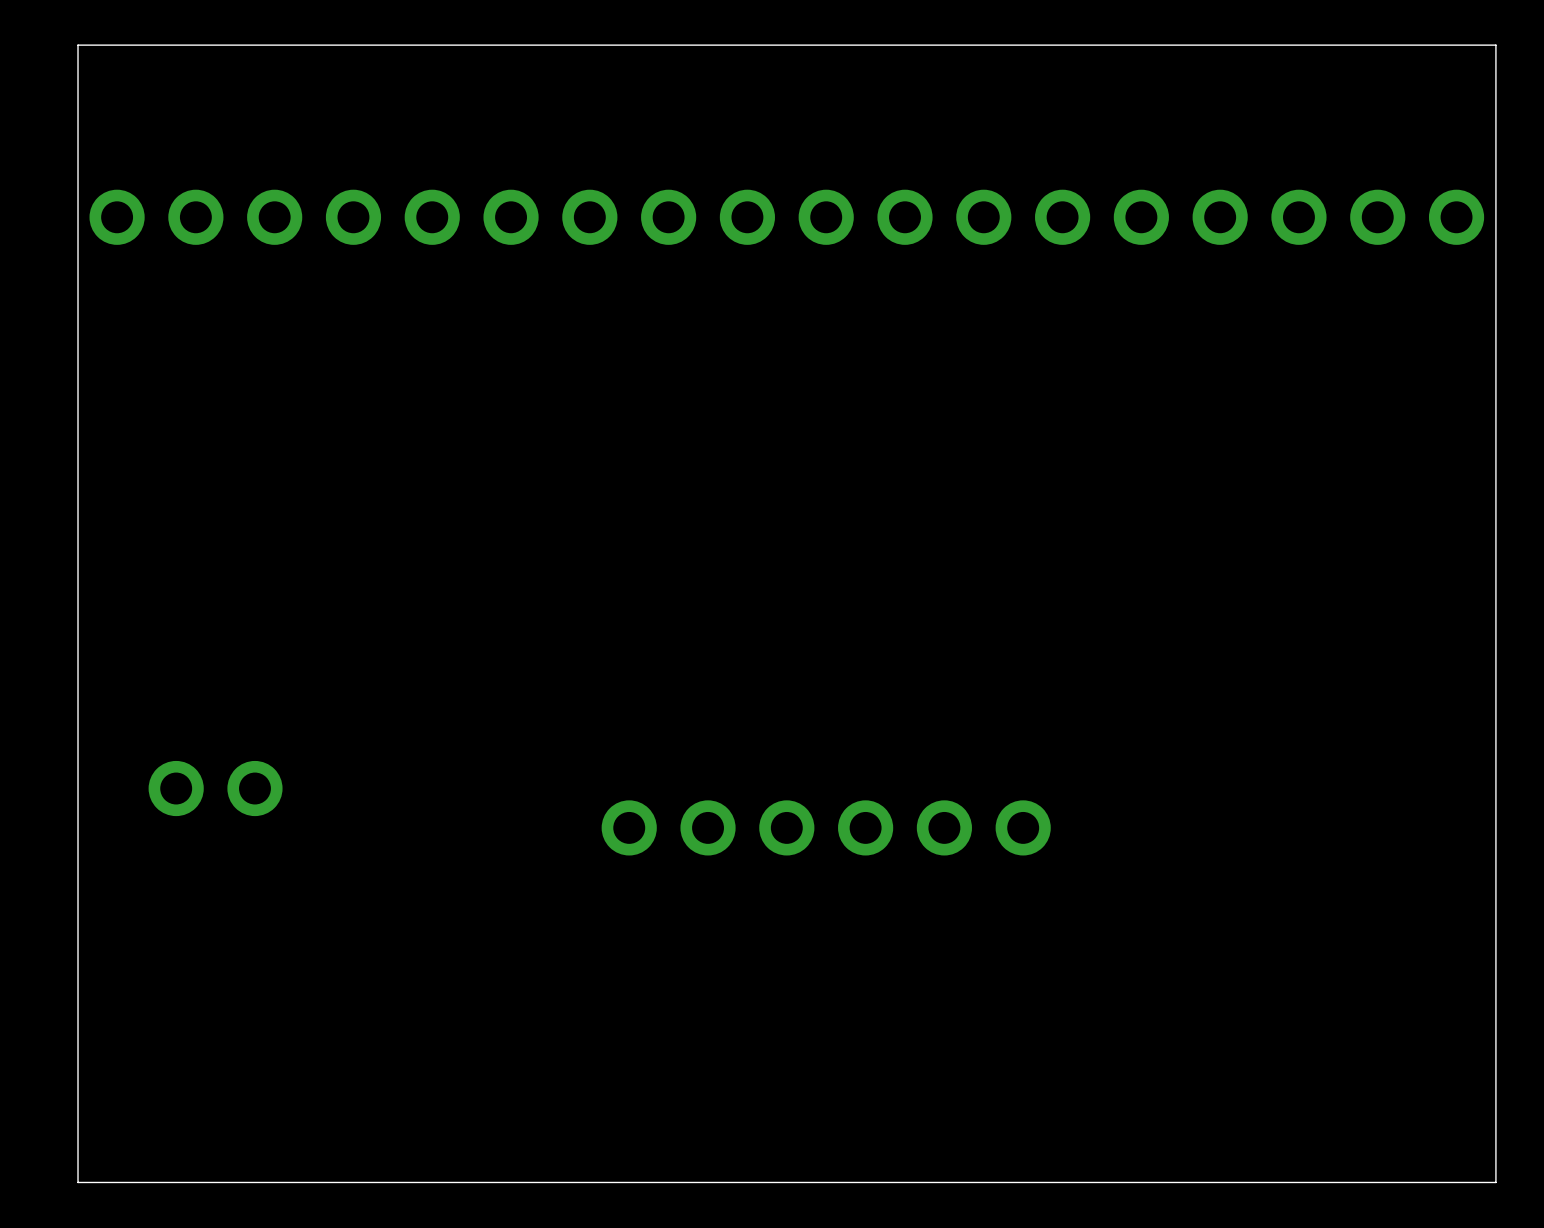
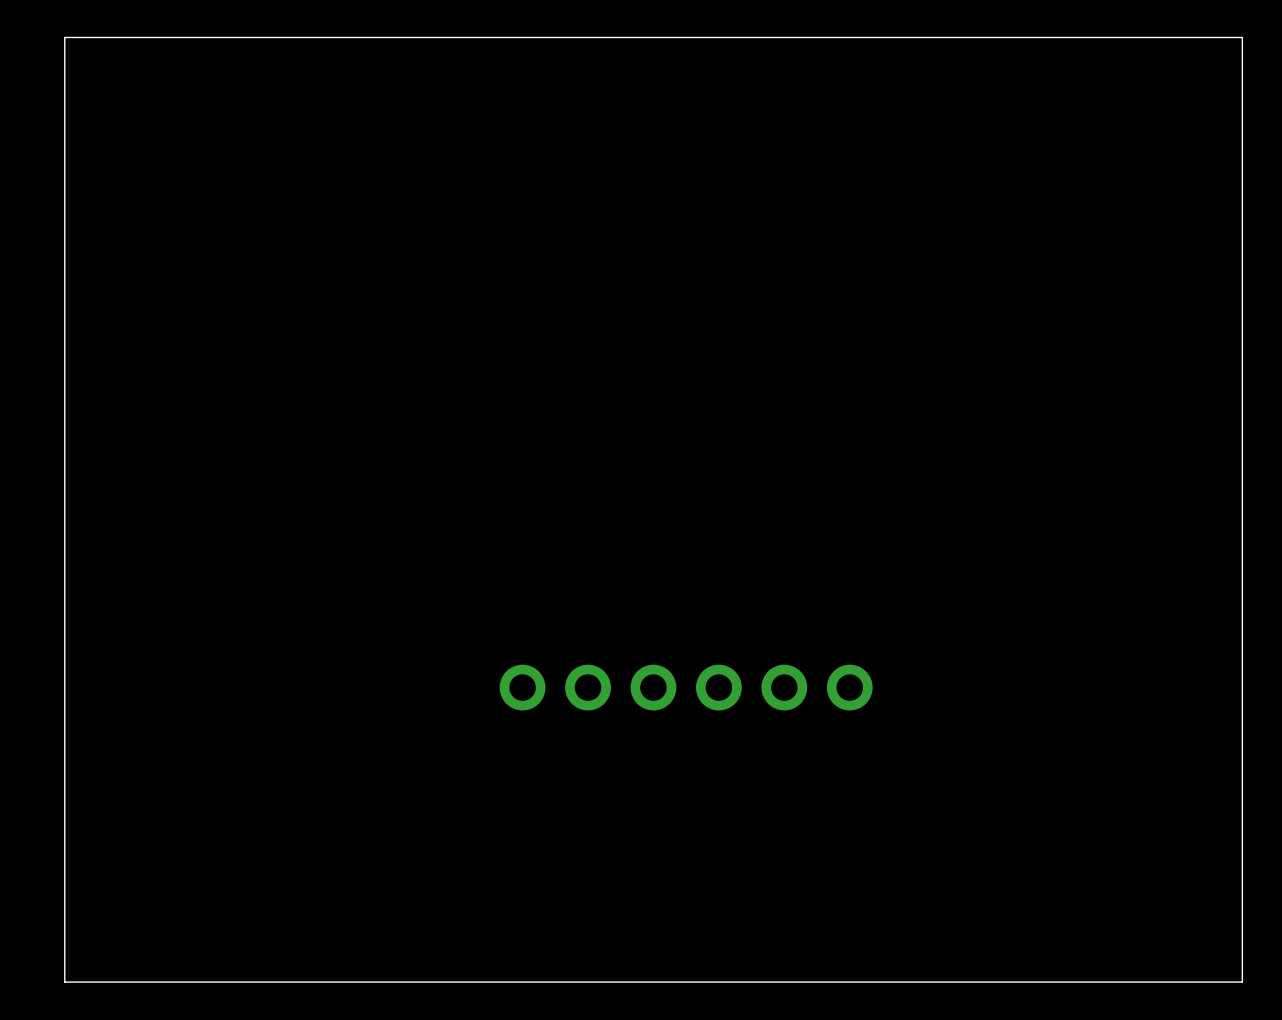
part: (156, 217) -> none
part: (314, 217) -> none
part: (471, 217) -> none
part: (629, 217) -> none
part: (786, 217) -> none
part: (944, 217) -> none
part: (1101, 217) -> none
part: (1259, 217) -> none
part: (1417, 217) -> none
part: (215, 788) -> none

